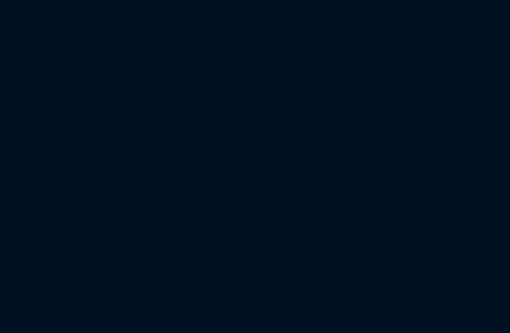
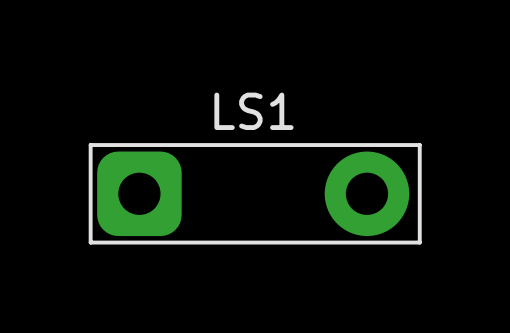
LS1: none -> (255, 193)

